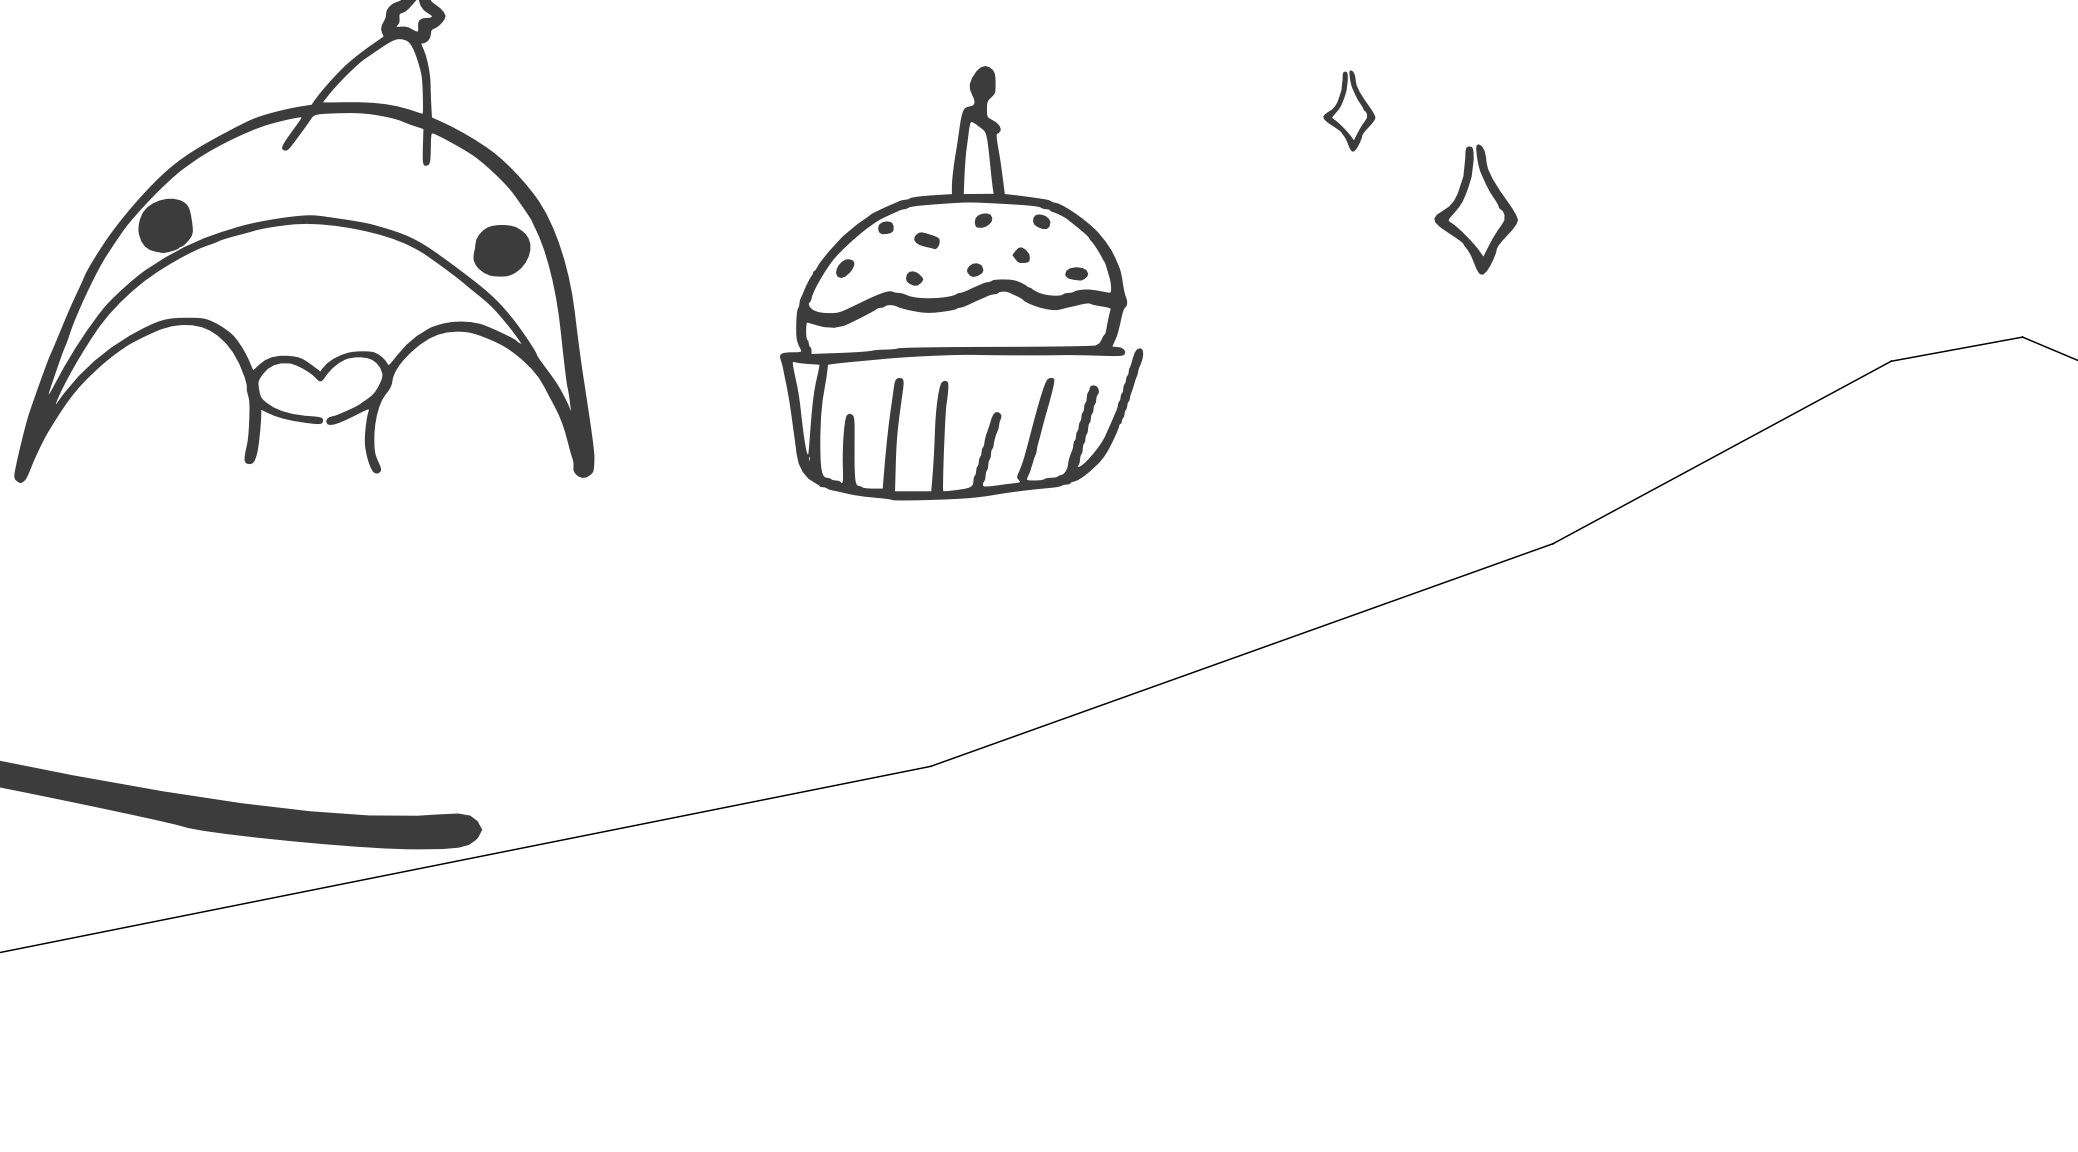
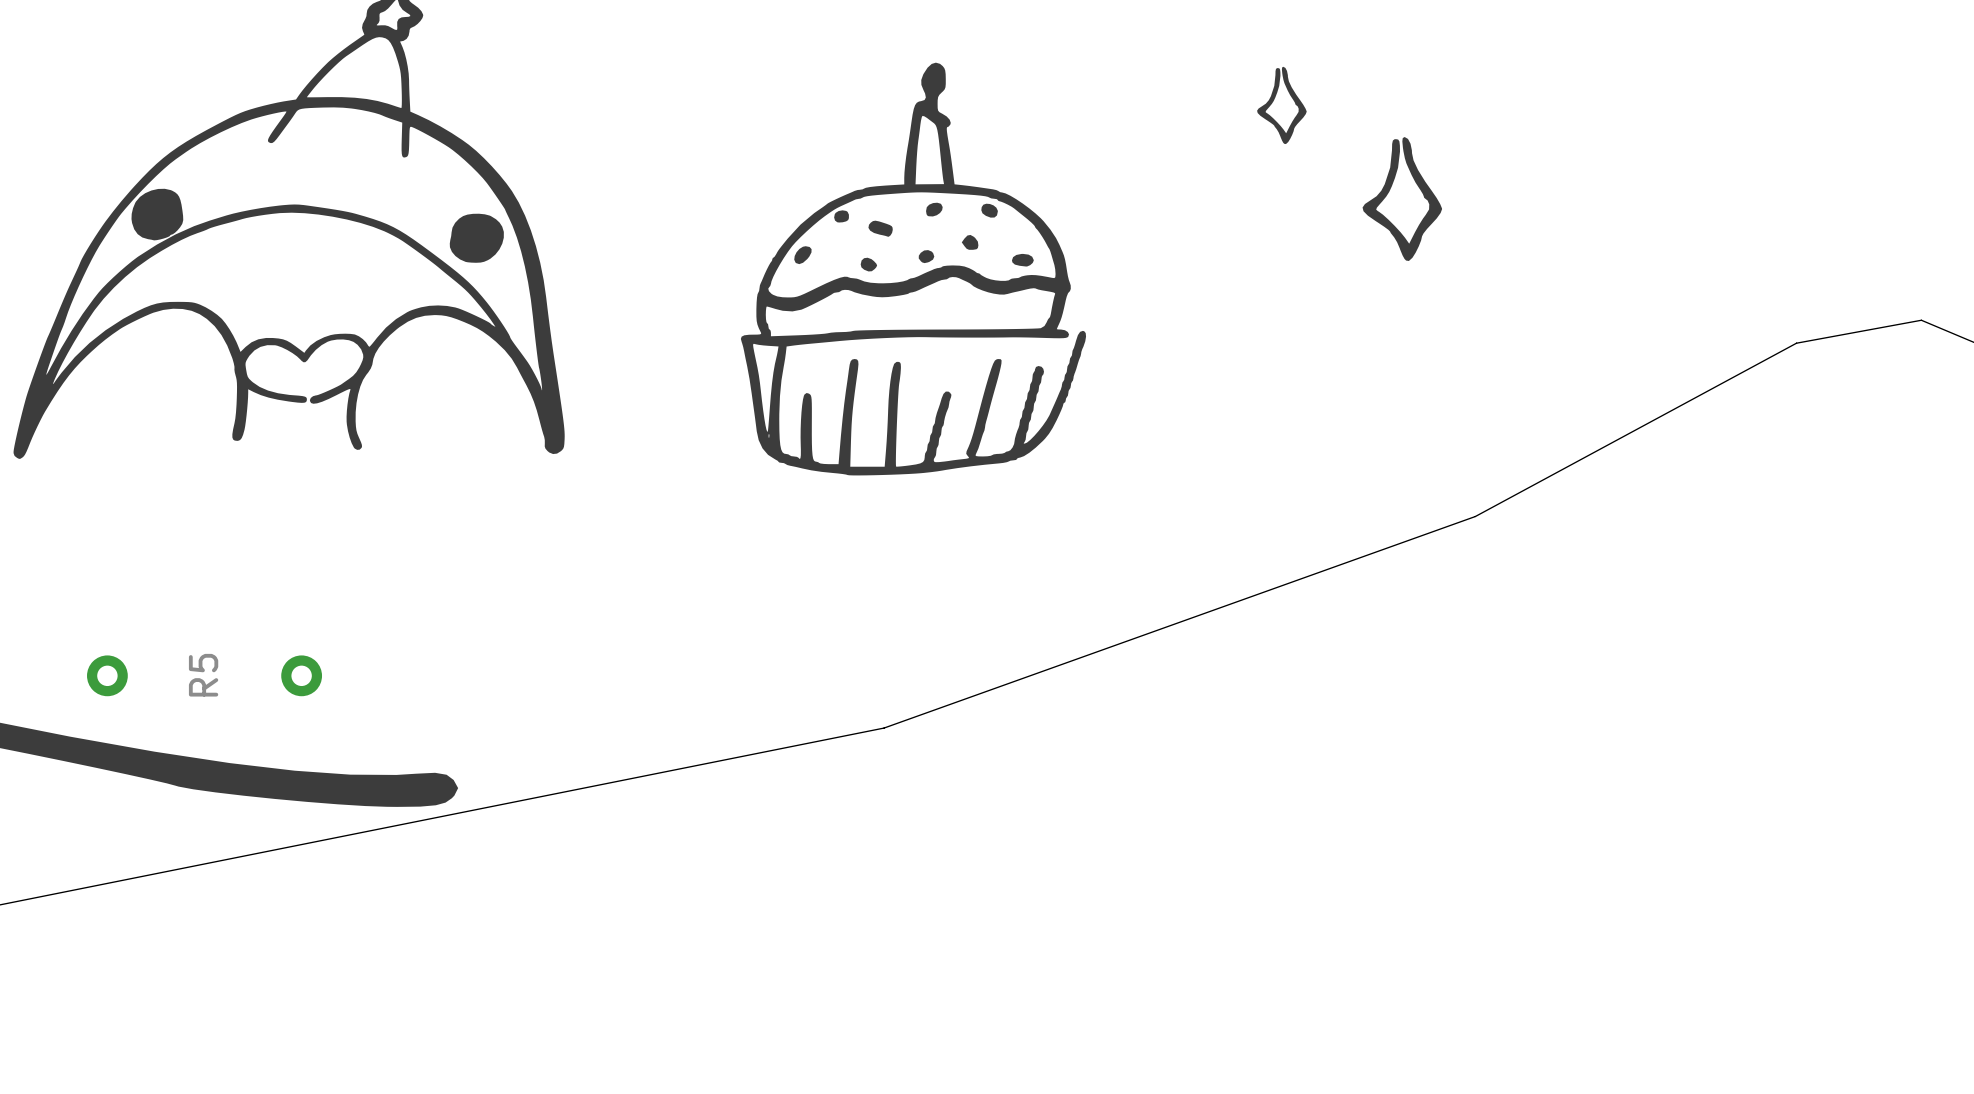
R5: none -> (204, 675)

